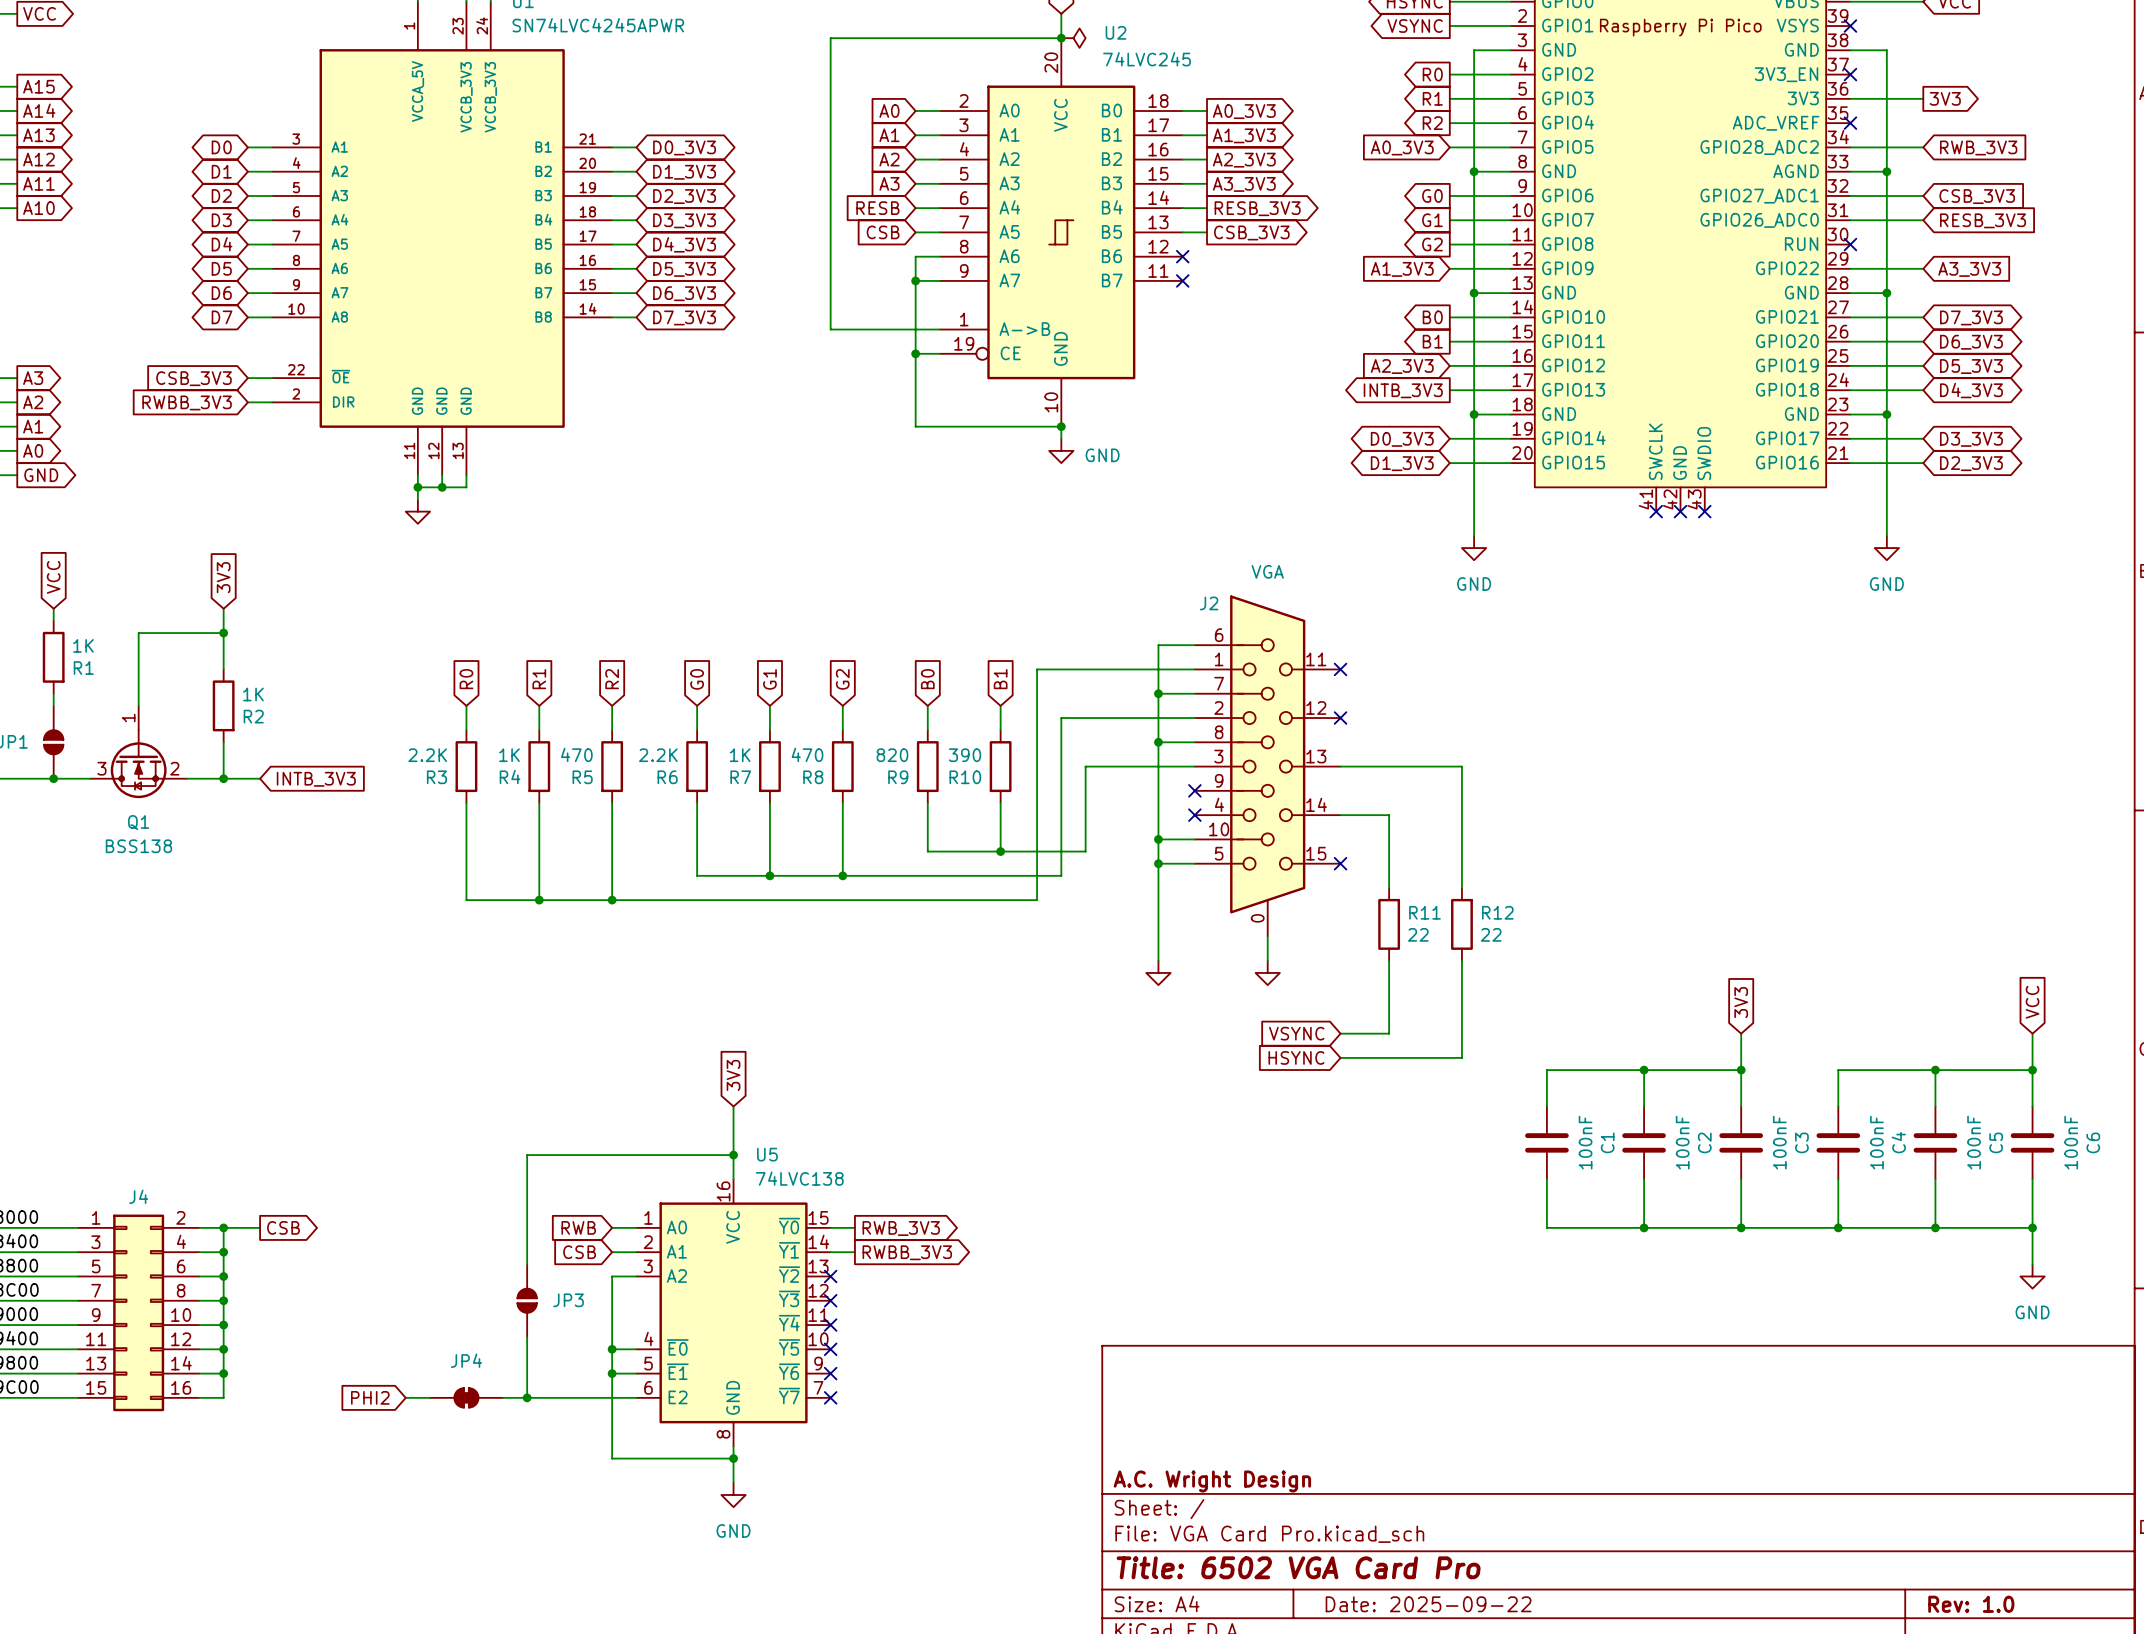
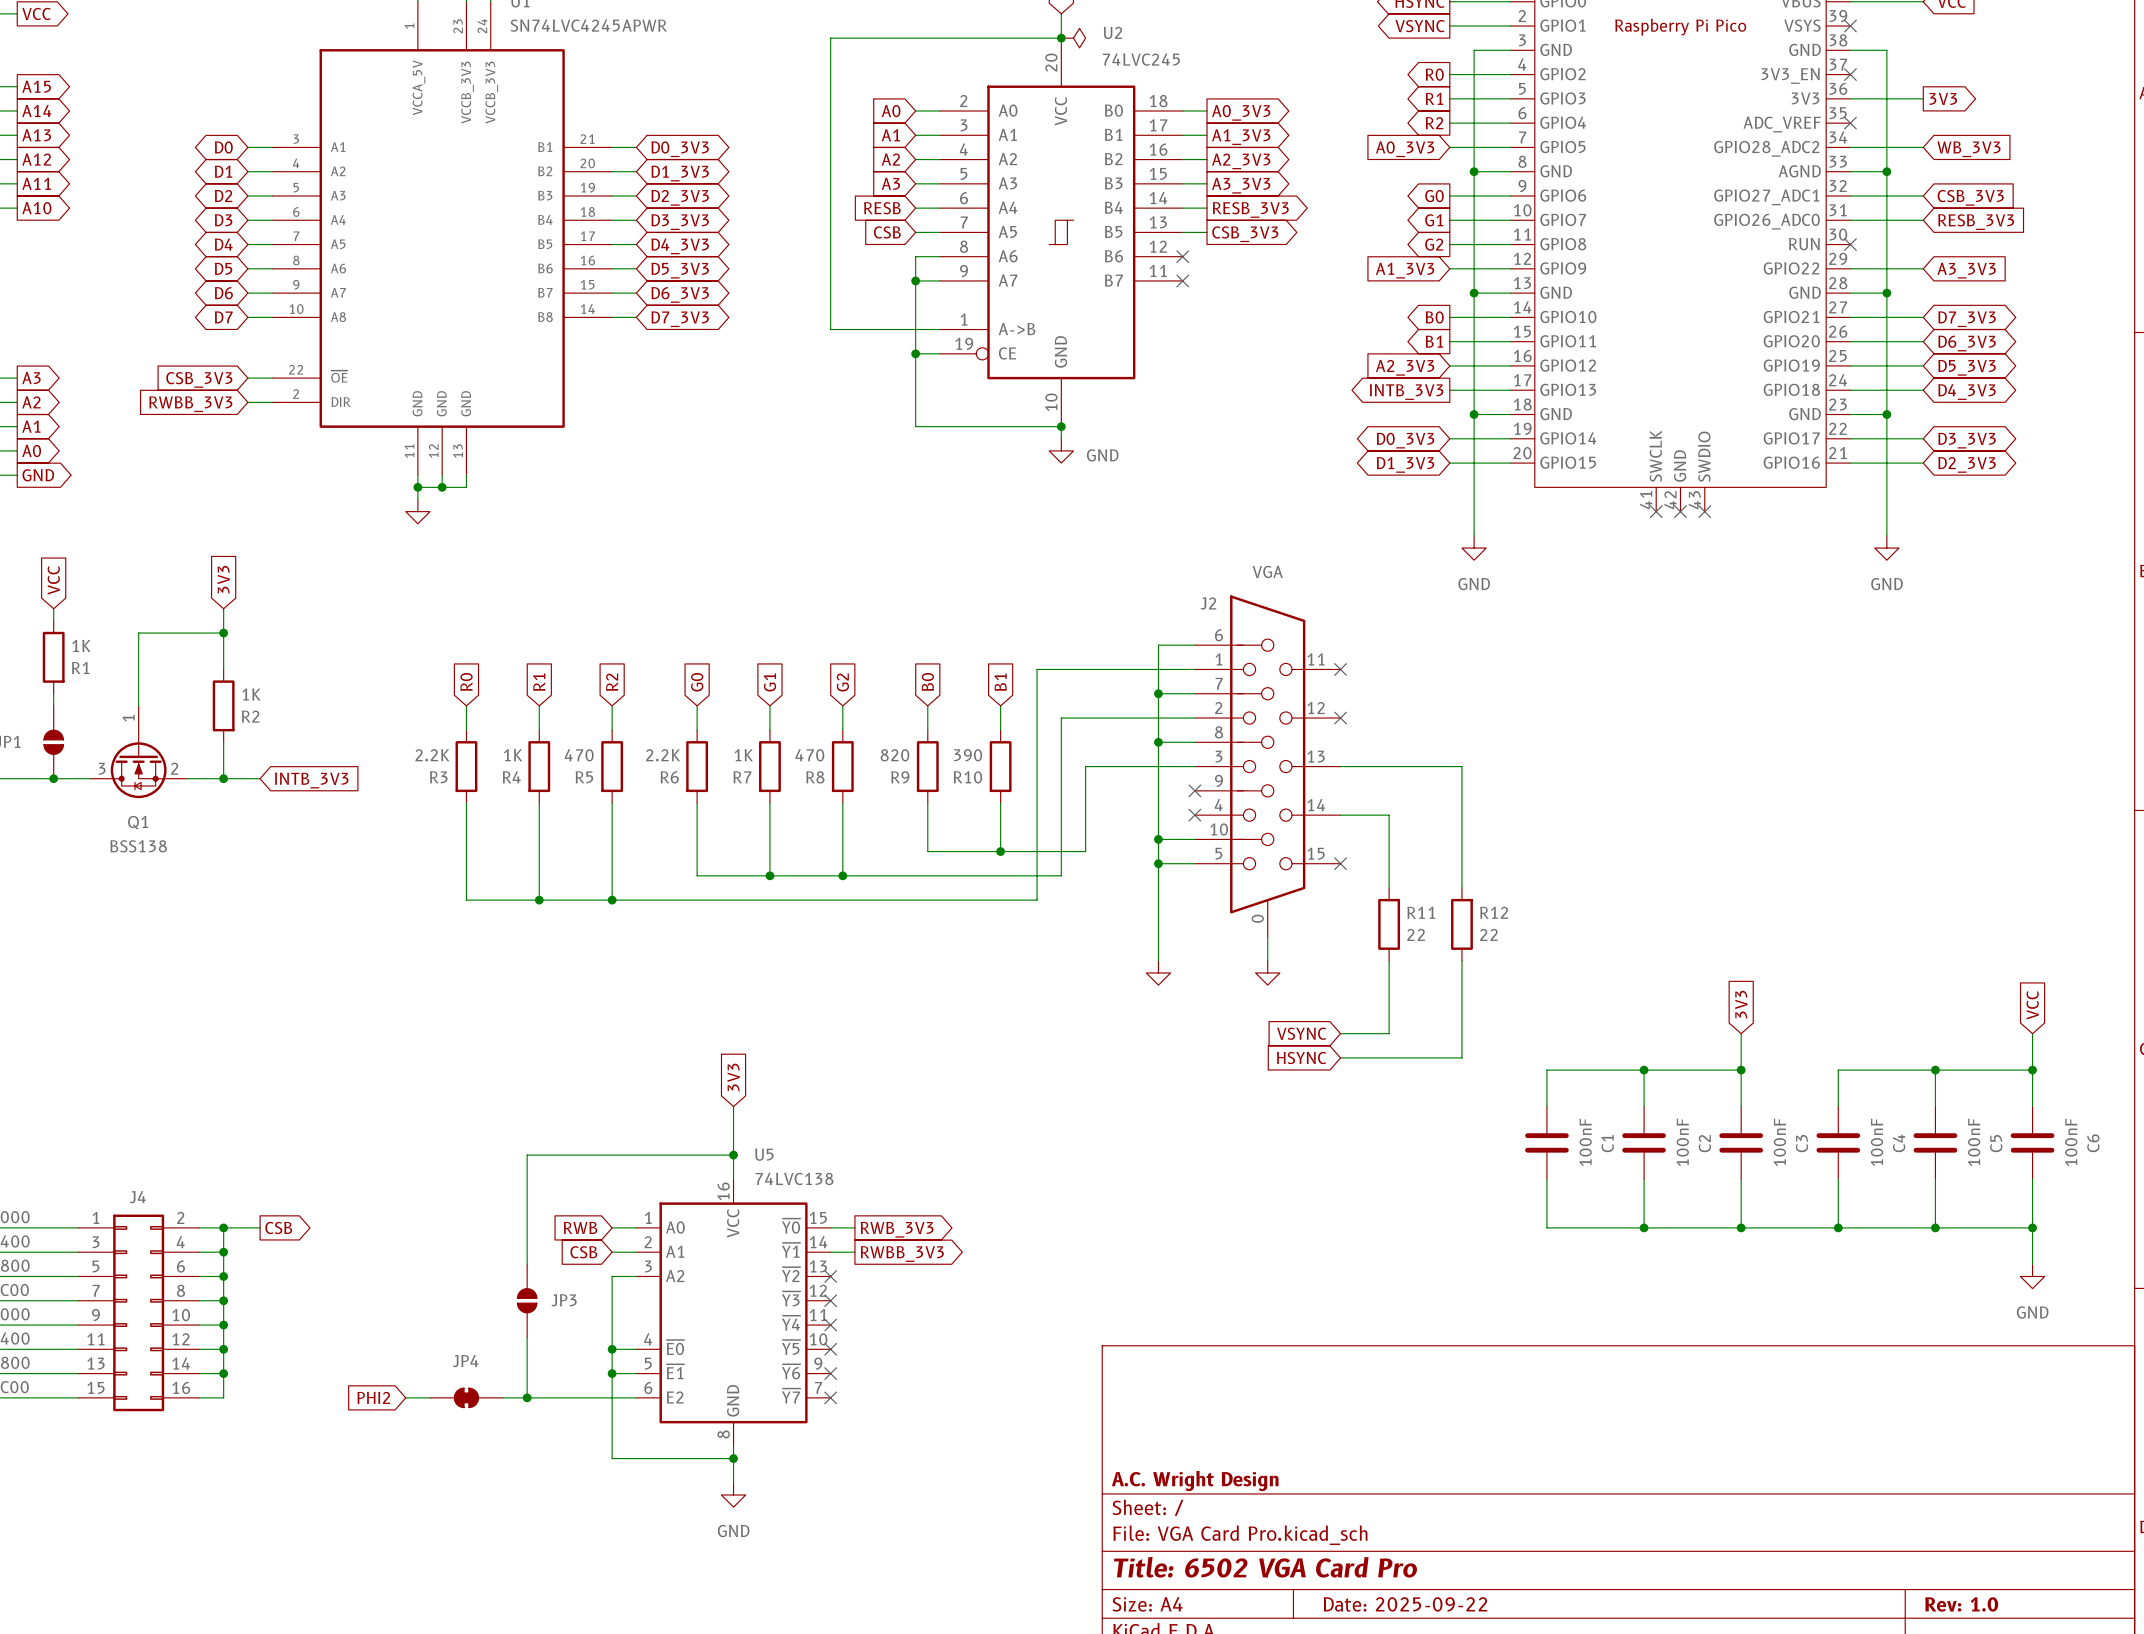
global label: RWB_3V3 (1978, 148) -> WB_3V3 (1969, 149)

